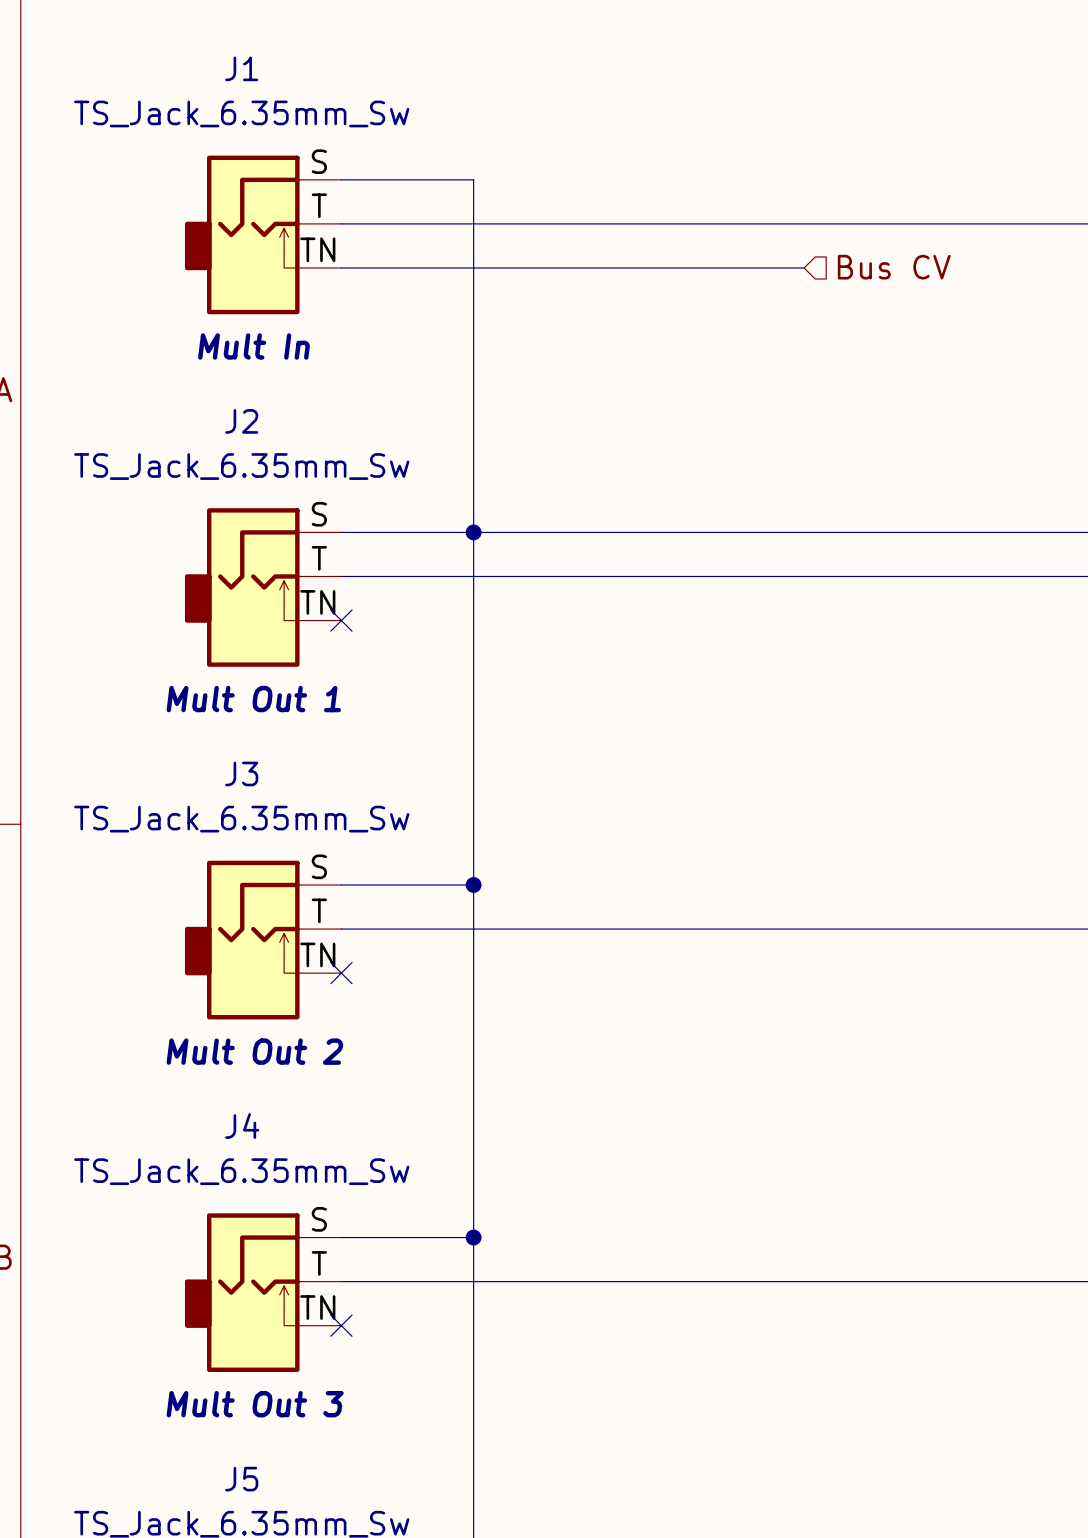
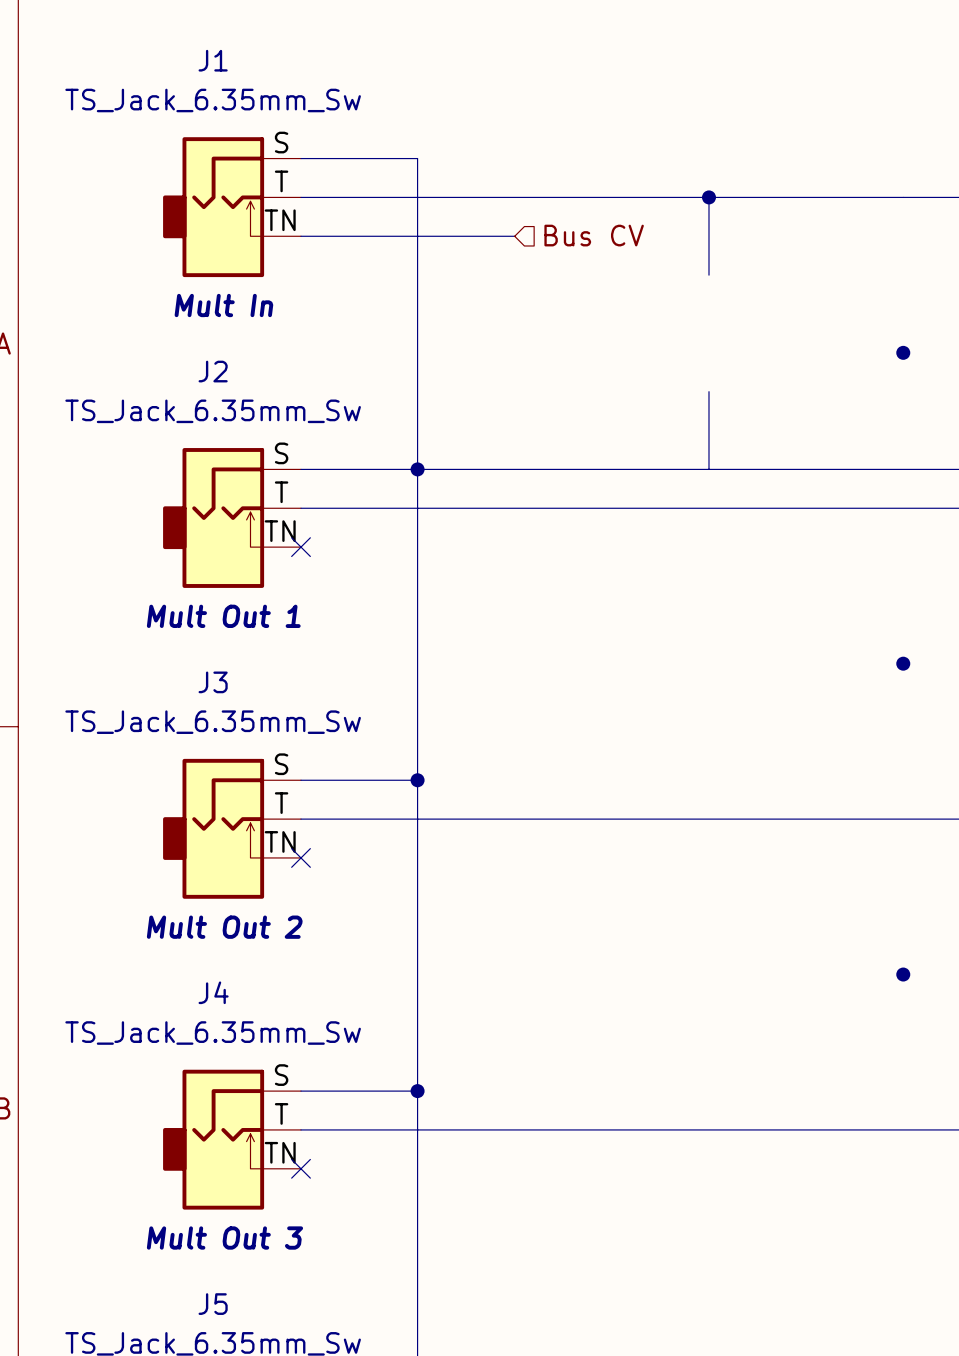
wire: none -> (708, 197) (708, 275)
junction: none -> (708, 197)
wire: (583, 267) (804, 267) -> none
hierarchical label position: Bus CV (894, 267) -> Bus CV (594, 235)
junction: none -> (903, 352)
wire: none -> (708, 391) (708, 469)
junction: none -> (903, 663)
junction: none -> (903, 974)

